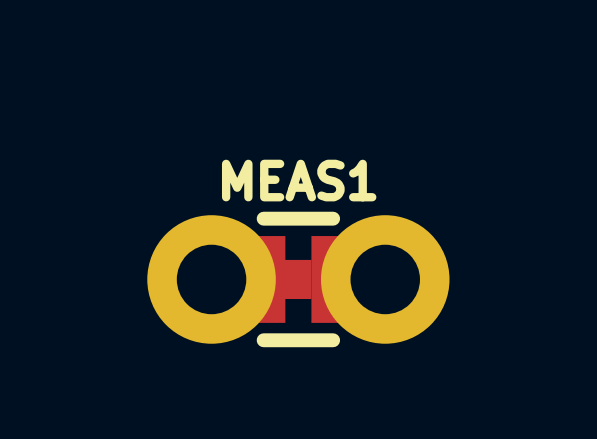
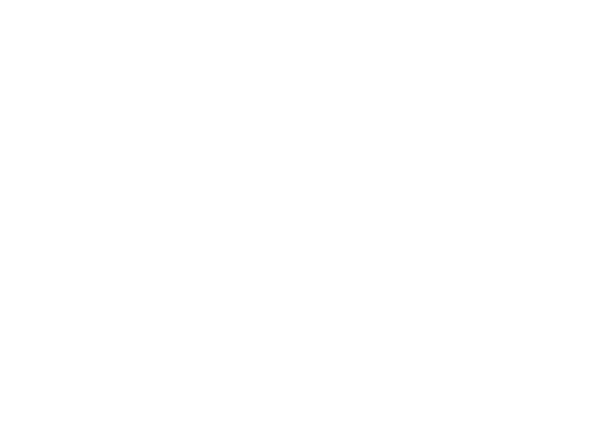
MEAS1: (298, 279) -> none

